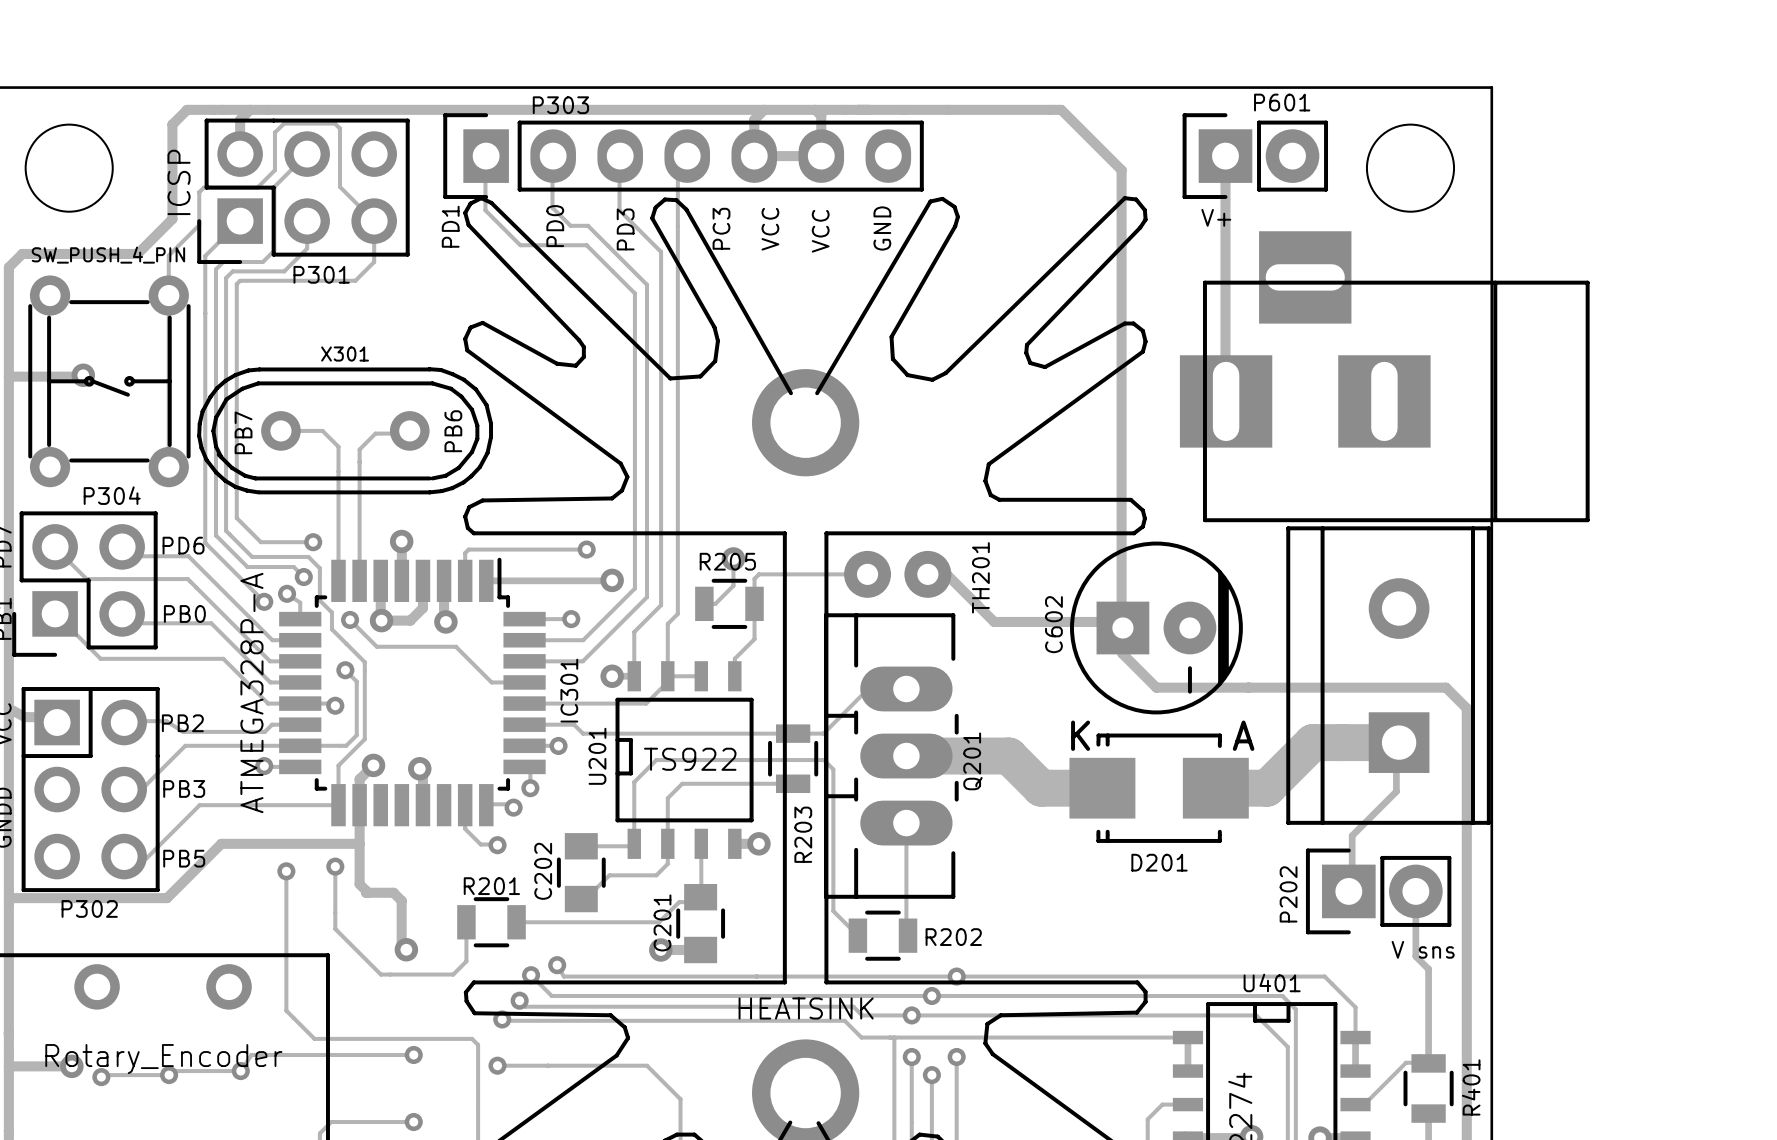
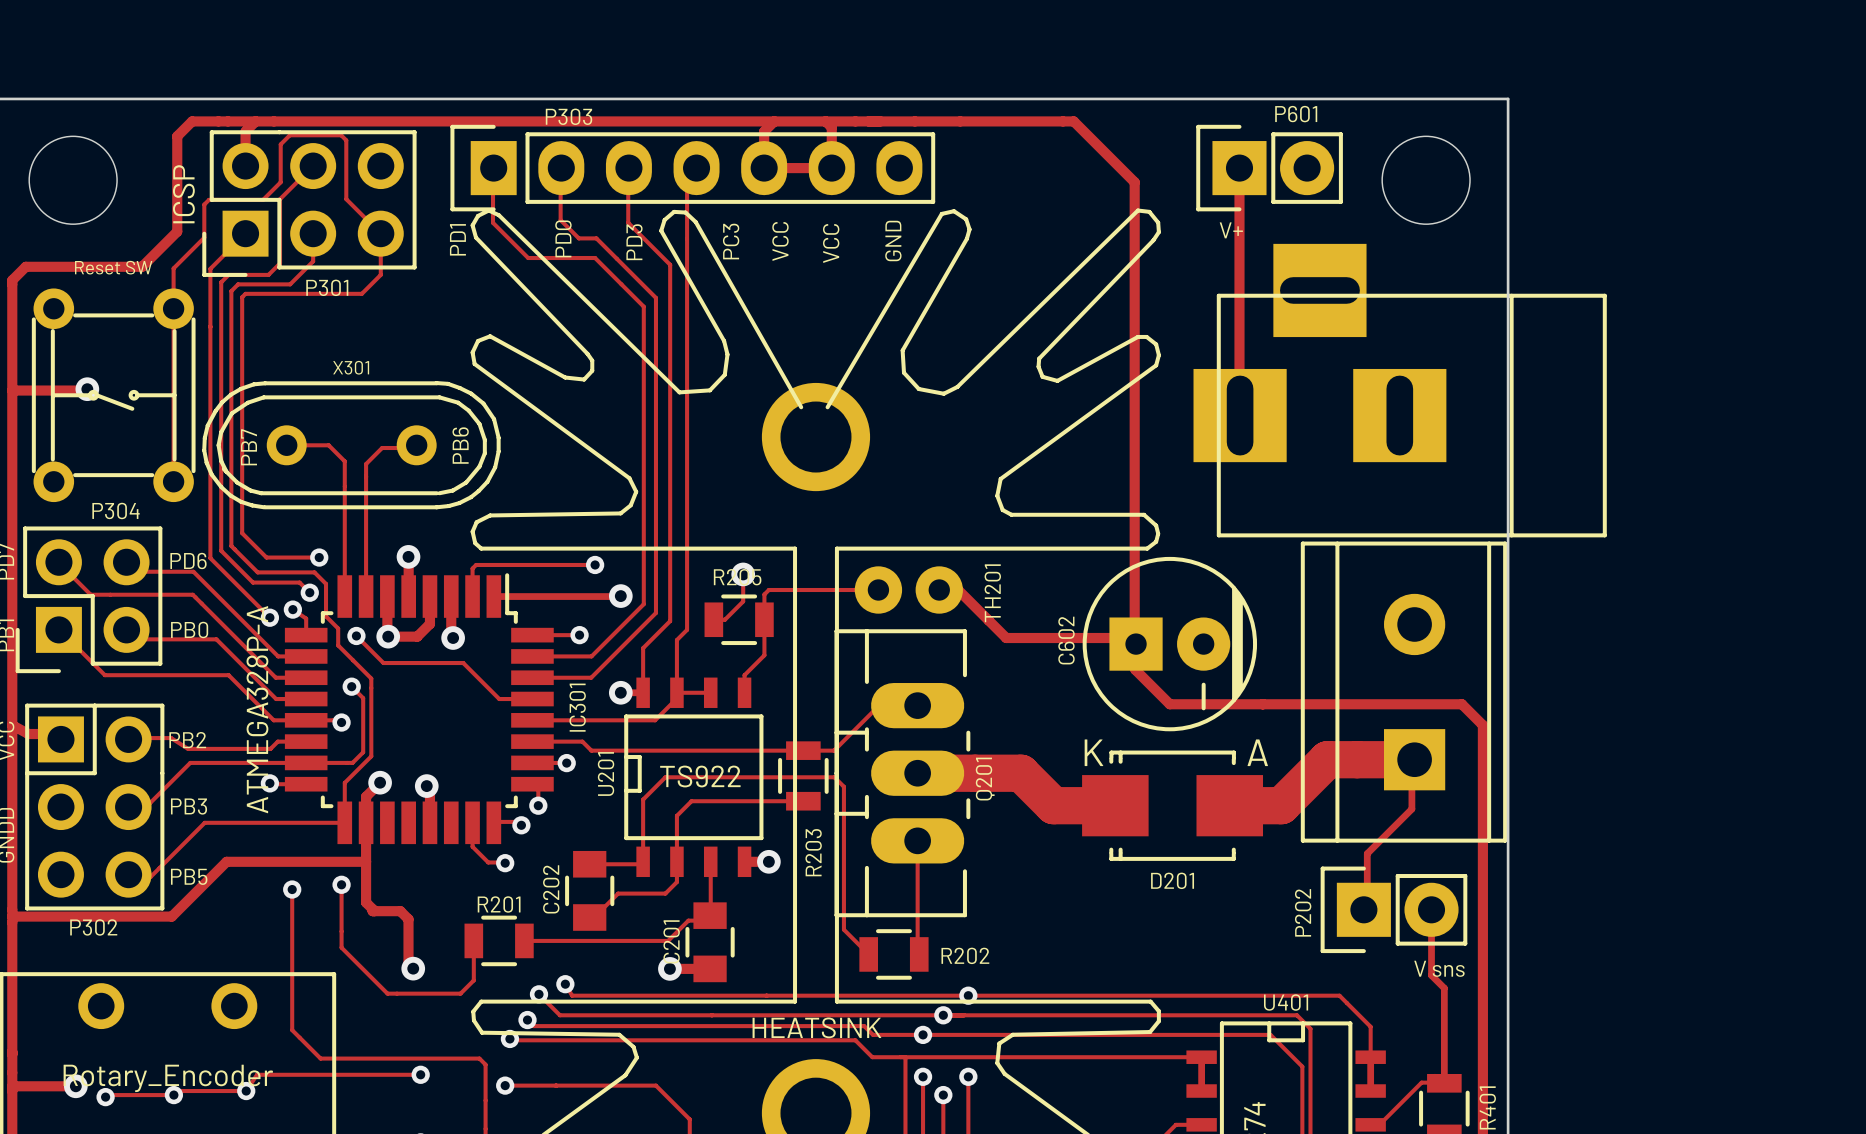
part value: SW_PUSH_4_PIN (108, 255) -> Reset SW (113, 267)

